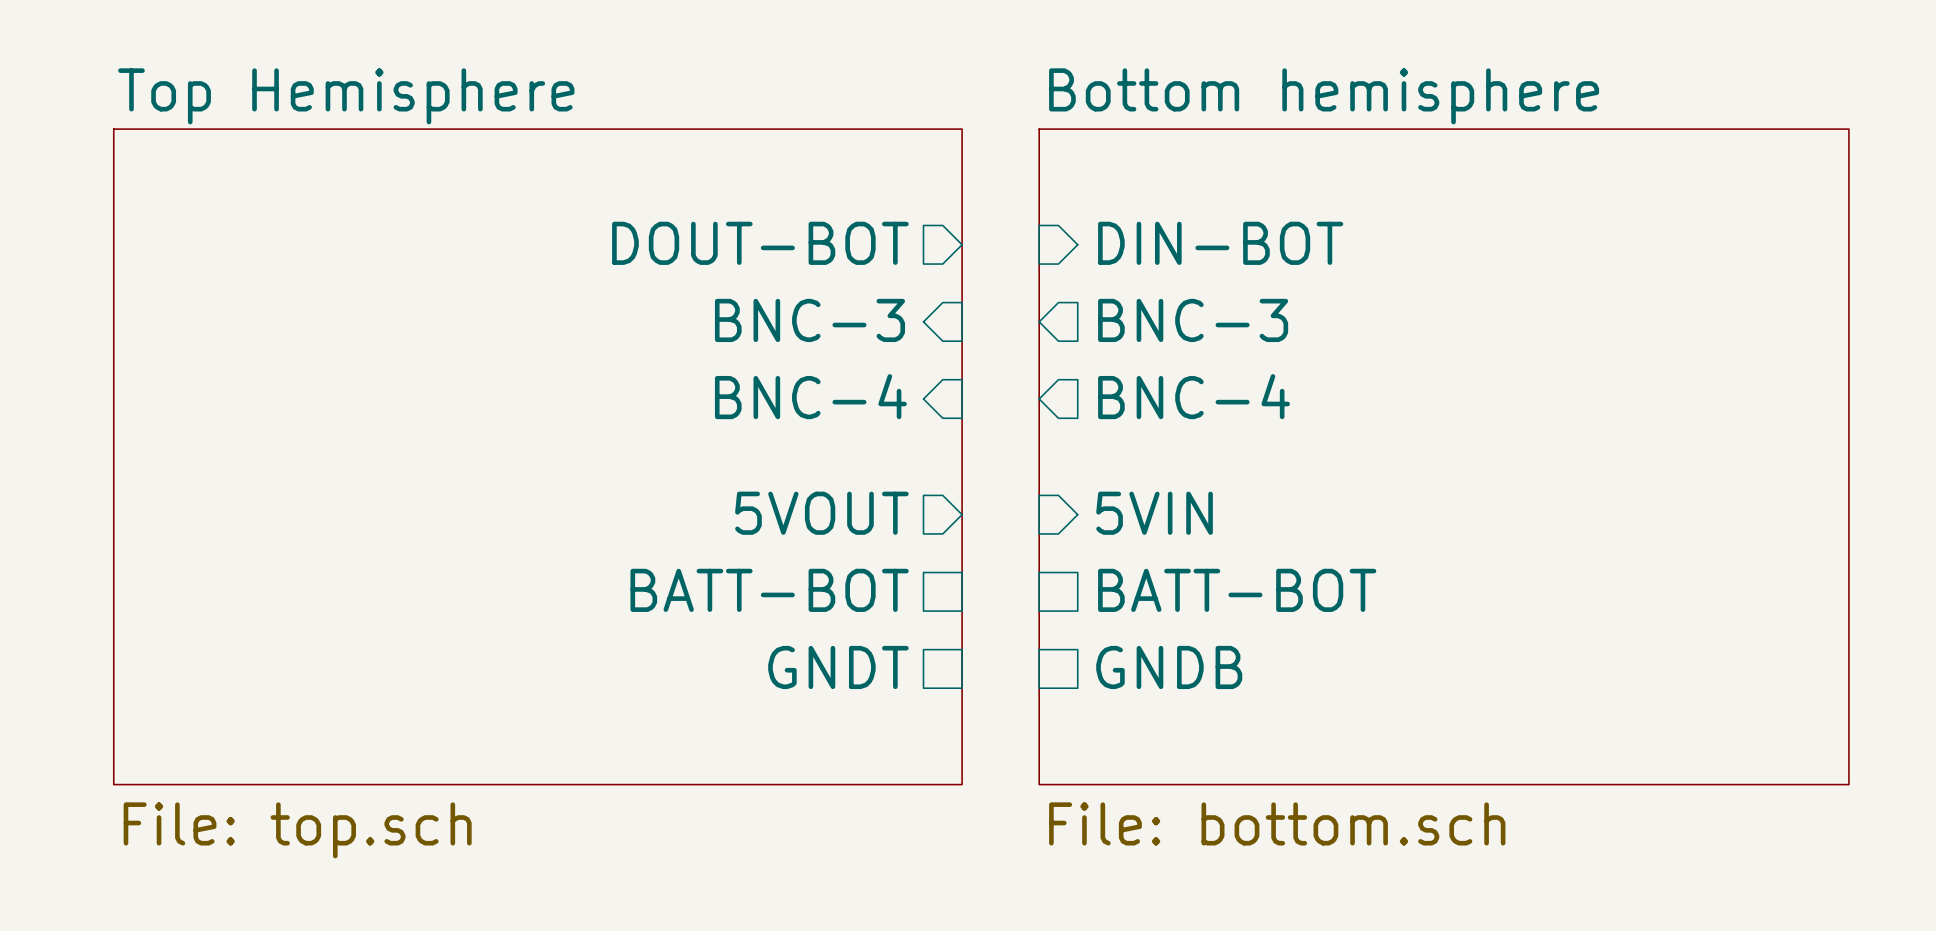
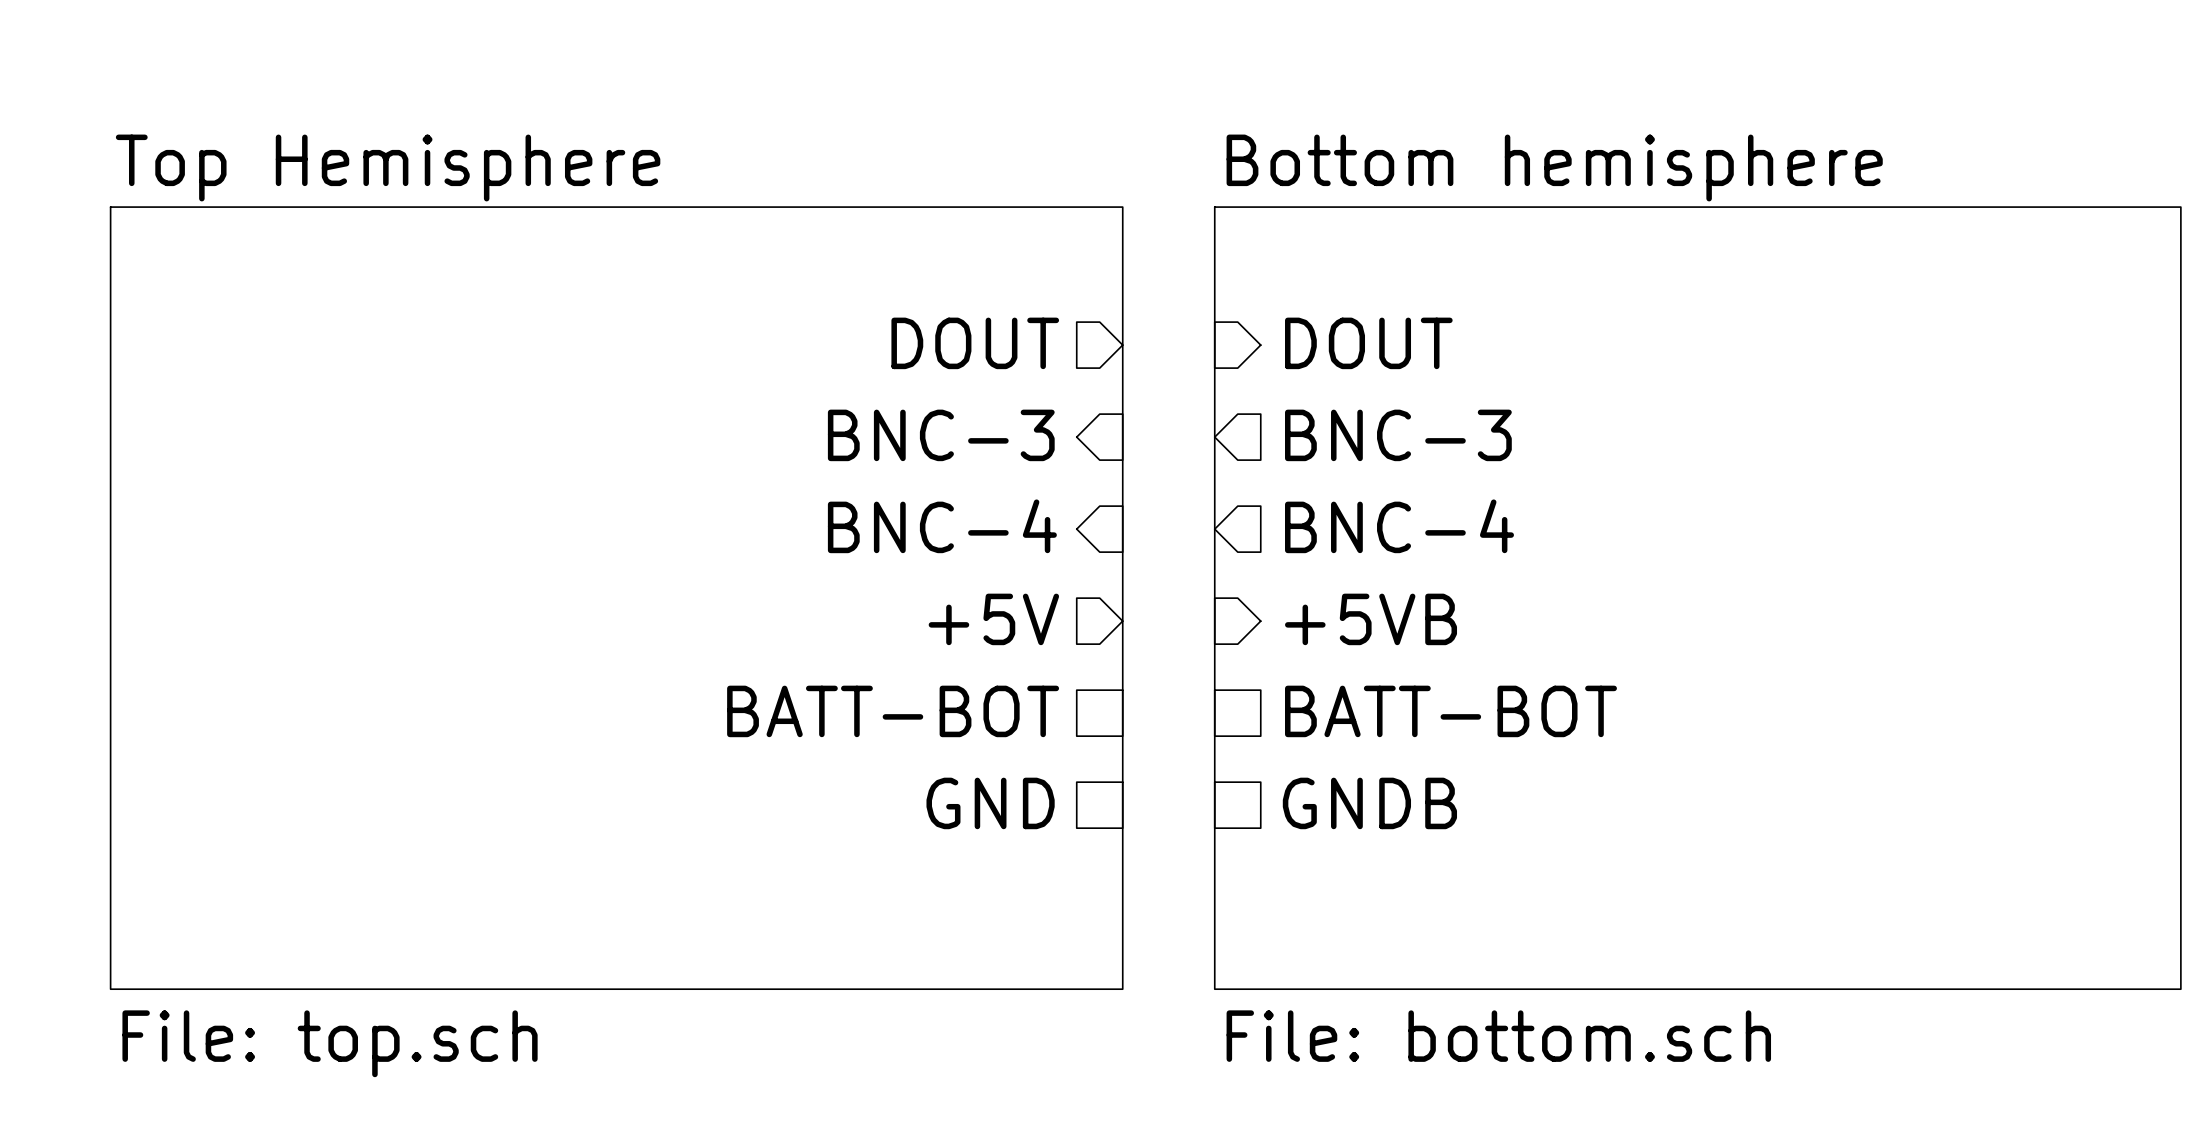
sheet pin: DOUT-BOT (760, 243) -> DOUT (975, 343)
sheet pin: DIN-BOT (1220, 243) -> DOUT (1368, 343)
sheet pin: none -> +5V (993, 619)
sheet pin: none -> +5VB (1371, 619)
sheet pin: 5VOUT (821, 513) -> none
sheet pin: 5VIN (1154, 513) -> none
sheet pin position: BATT-BOT (769, 590) -> BATT-BOT (893, 711)
sheet pin position: BATT-BOT (1237, 590) -> BATT-BOT (1450, 711)
sheet pin: GNDT (838, 667) -> GND (990, 803)
sheet pin position: GNDB (1169, 667) -> GNDB (1369, 803)

